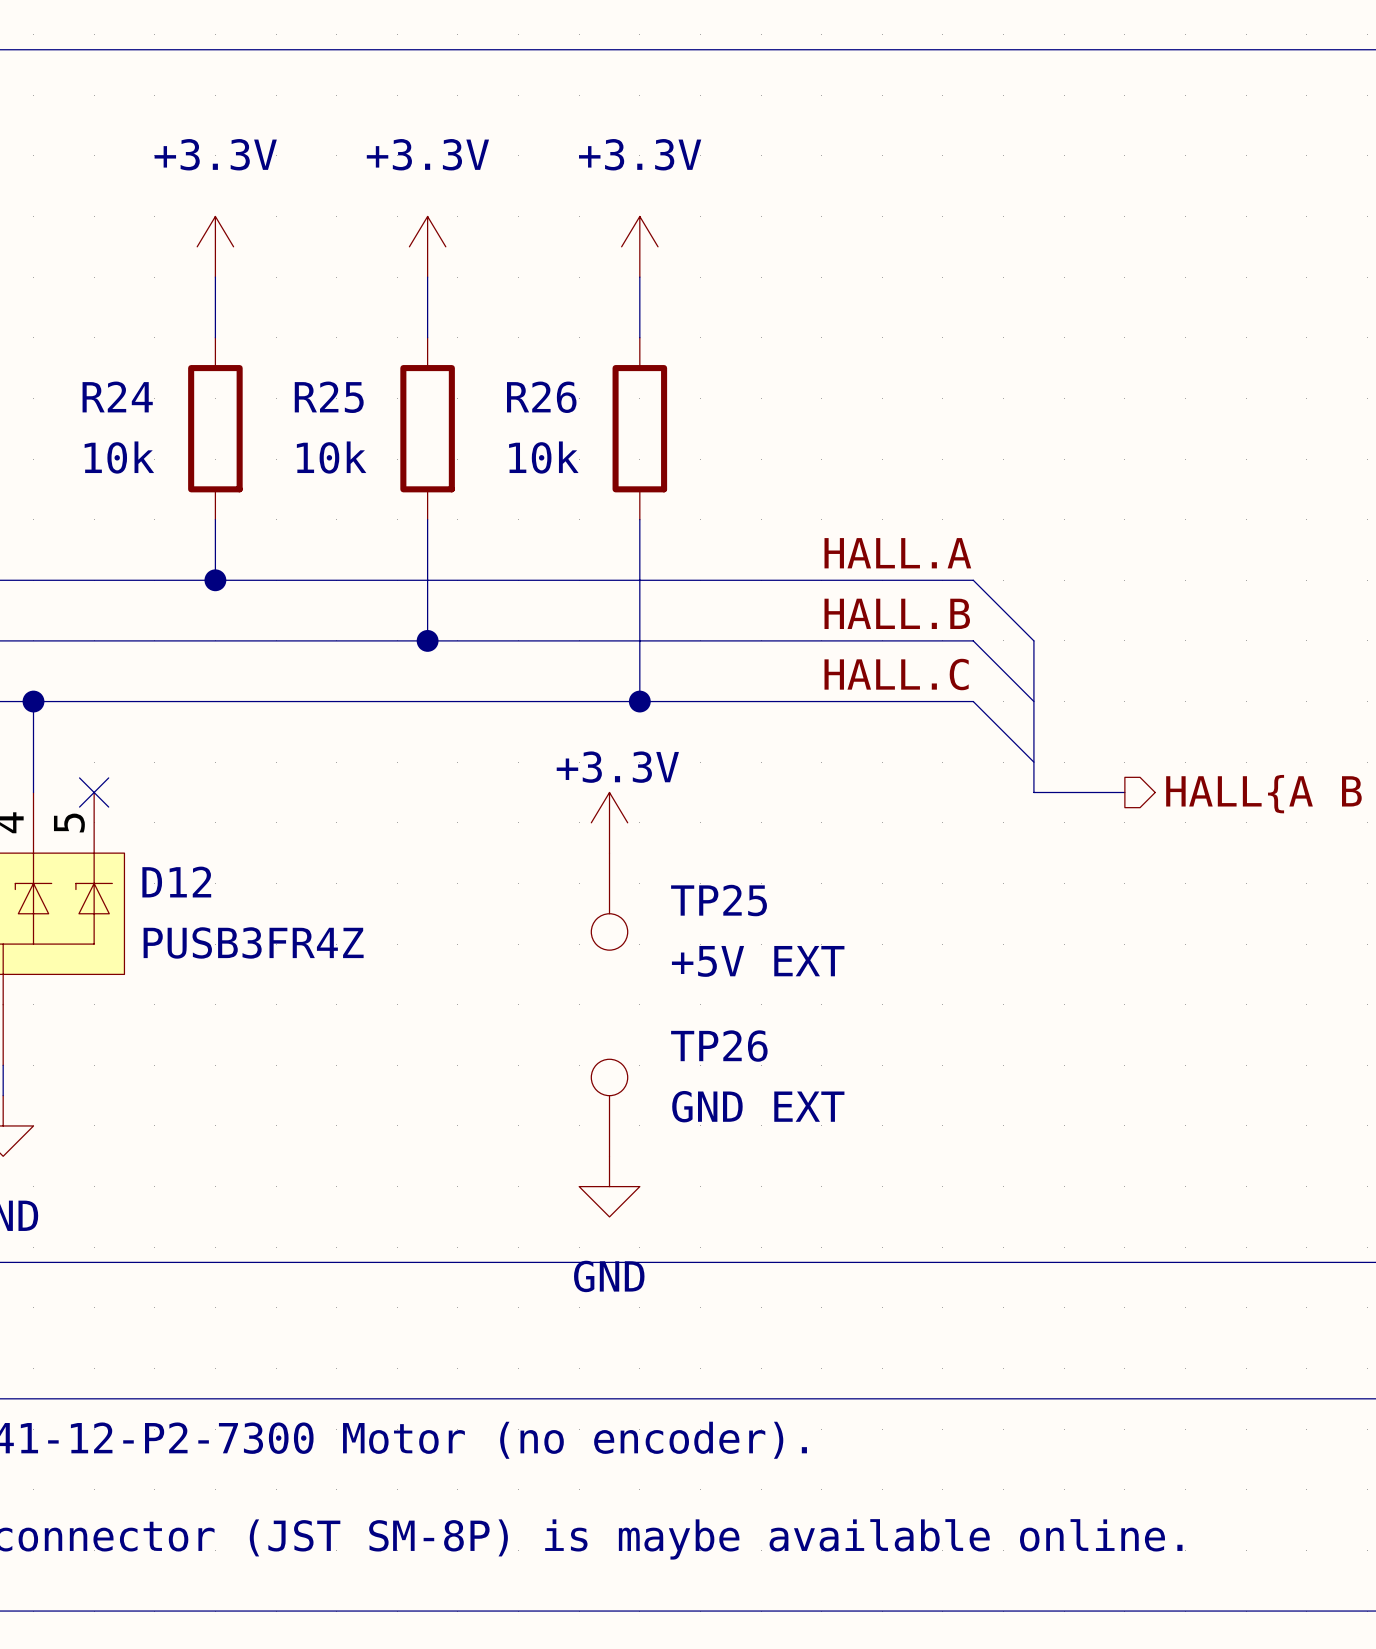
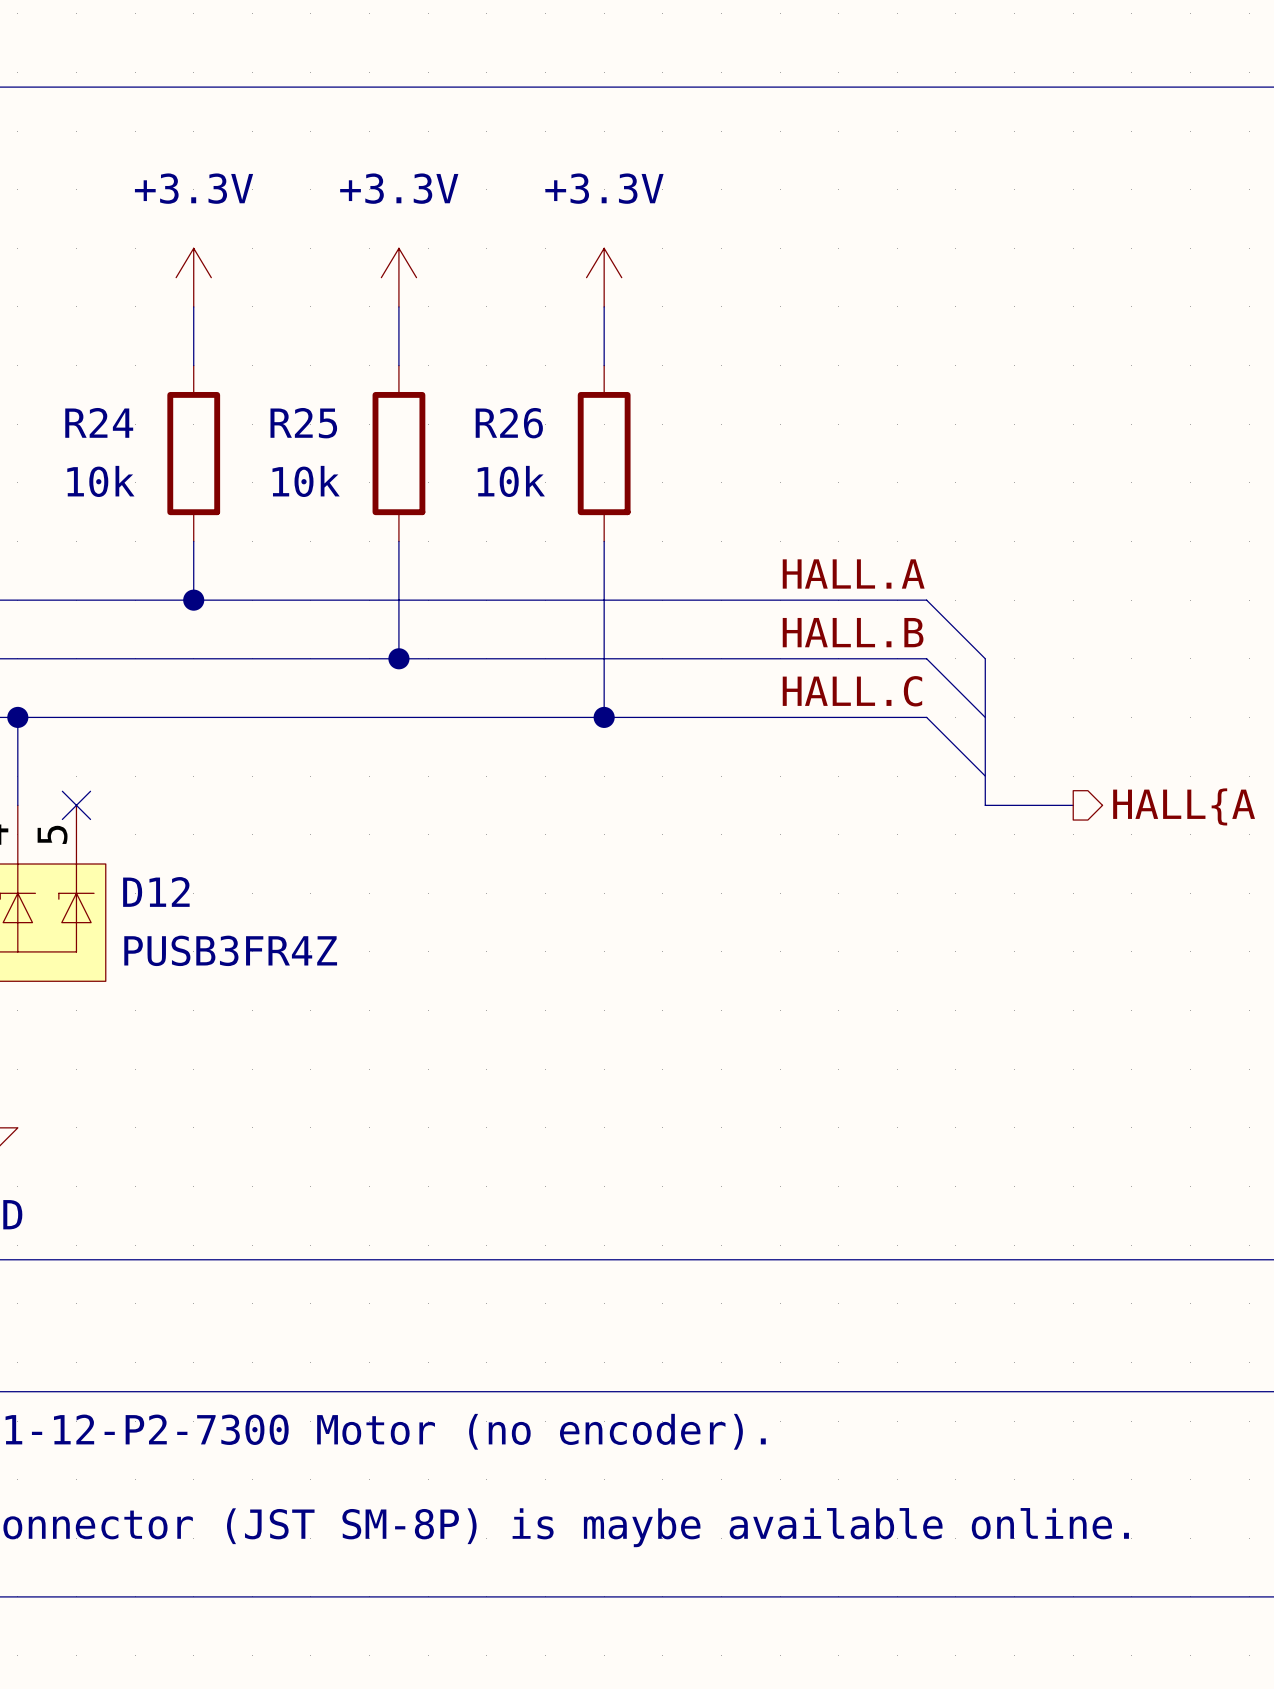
power symbol: +3.3V (609, 822) -> none
TP25: +5V EXT (609, 901) -> none
TP26: GND EXT (609, 1107) -> none
power symbol: GND (609, 1186) -> none

